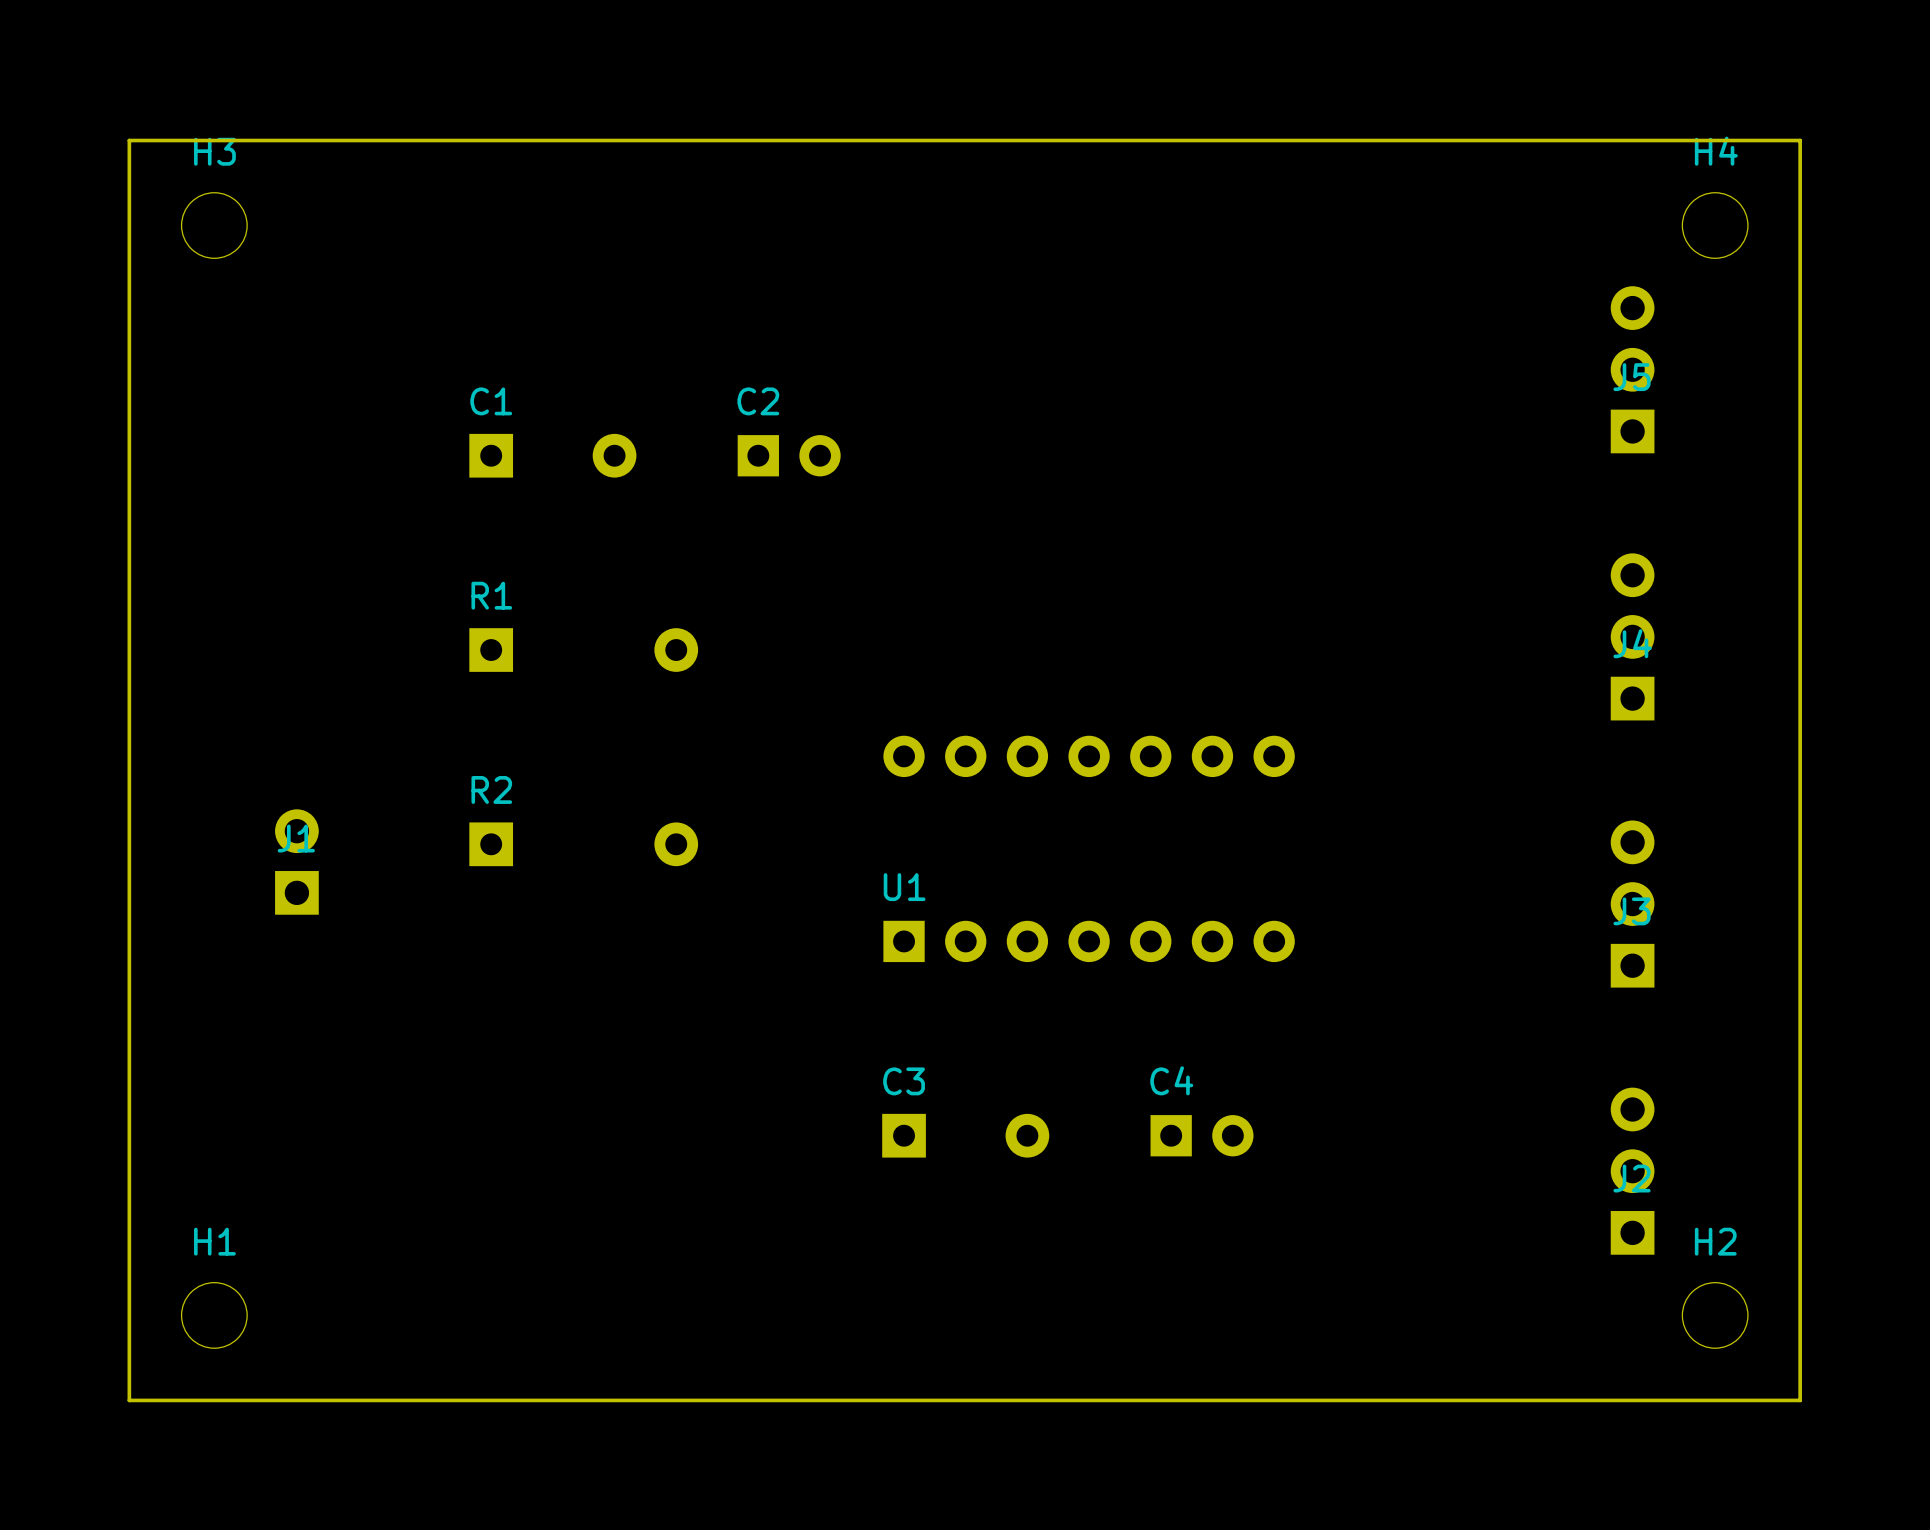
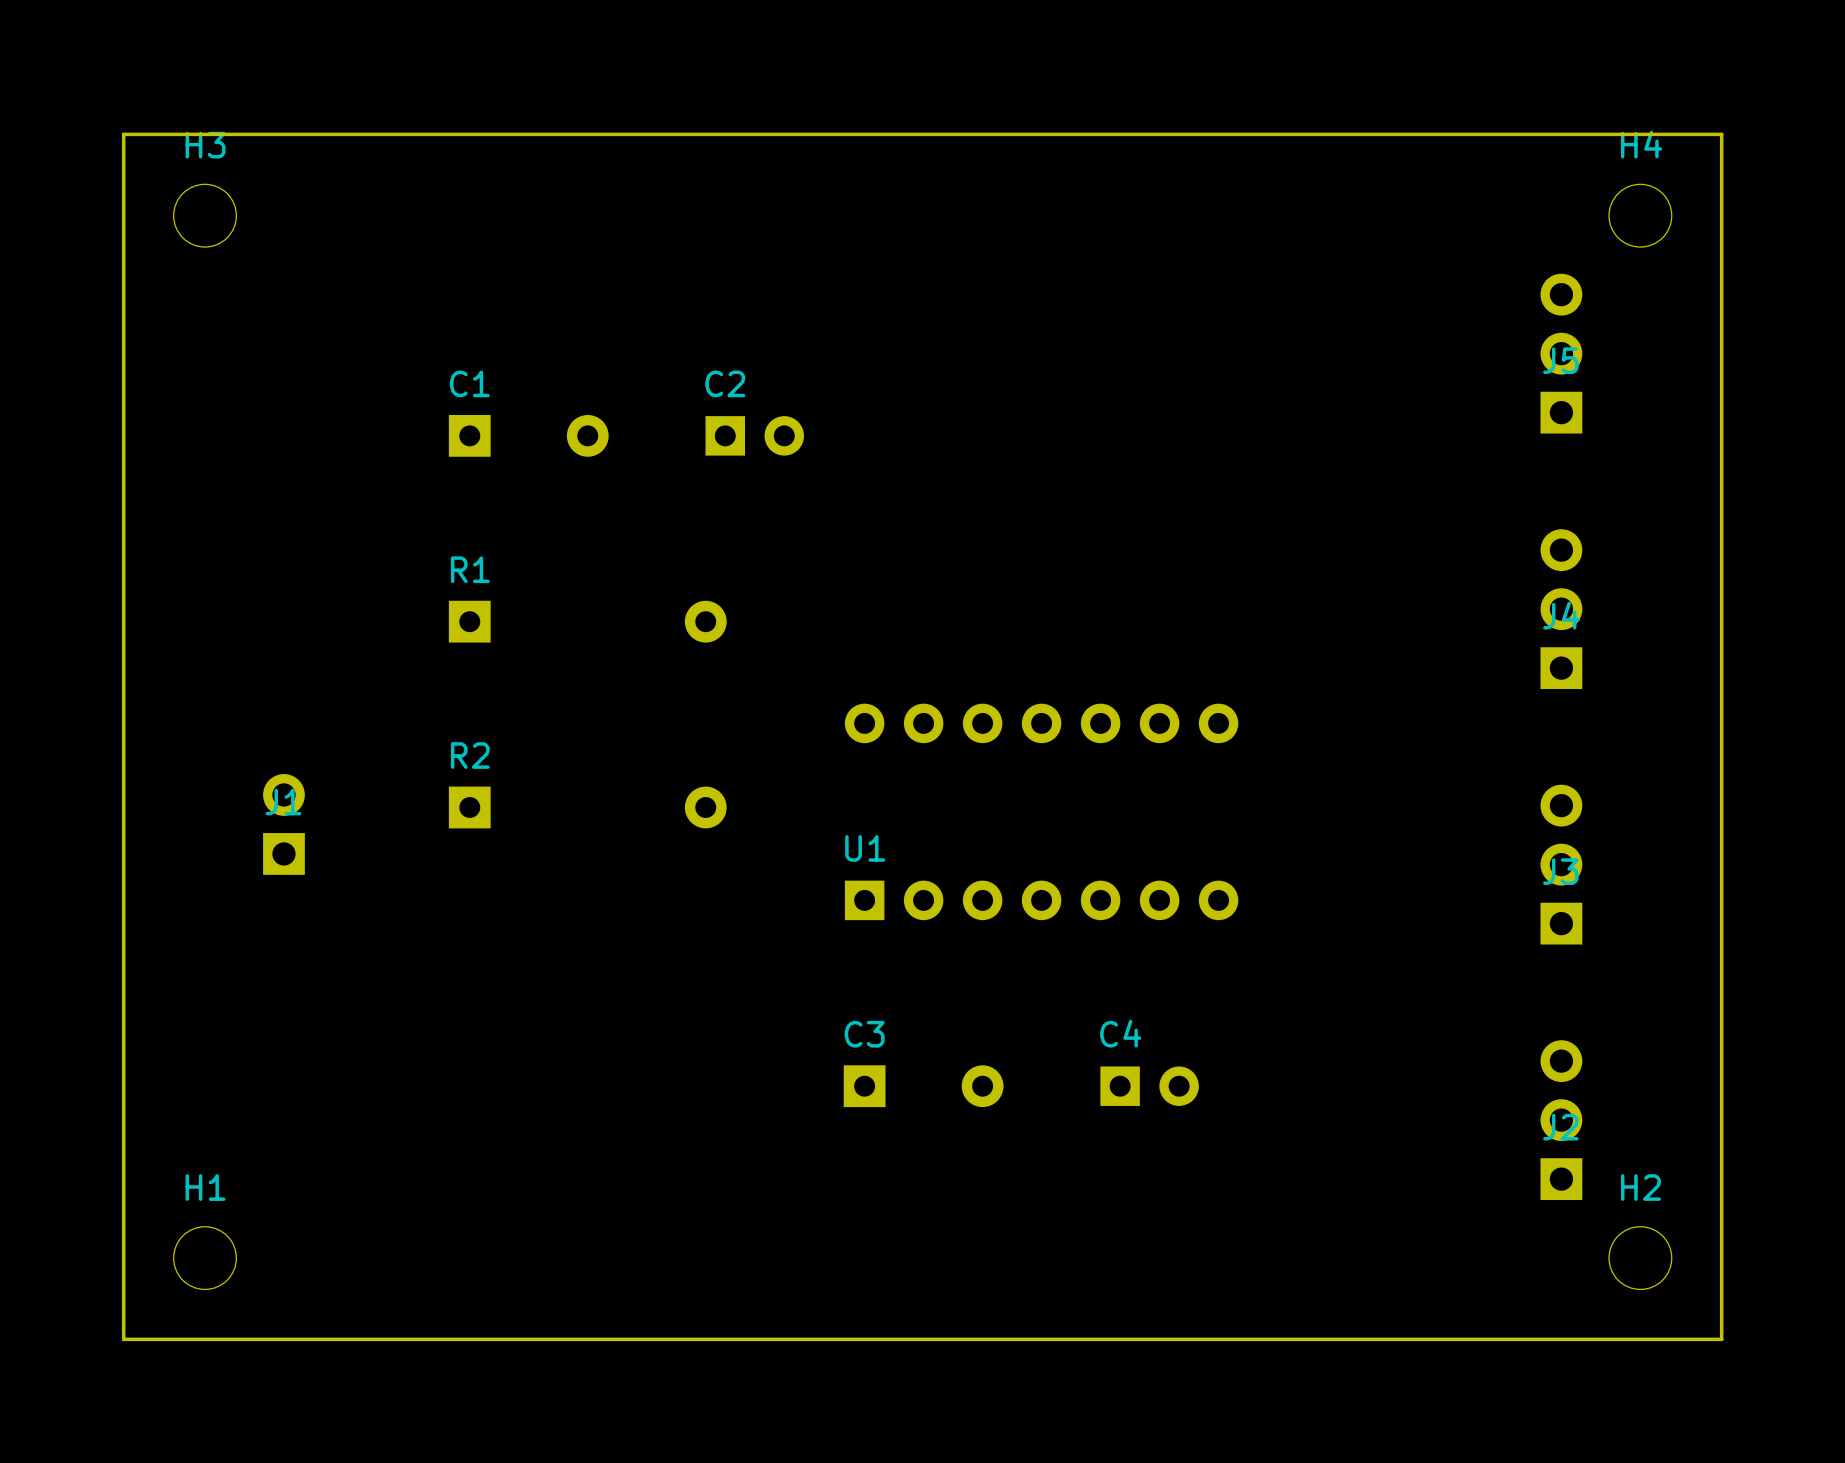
R1 footprint: [469, 628, 699, 672] -> [448, 600, 727, 643]
R2 footprint: [469, 822, 699, 867] -> [448, 786, 727, 829]

